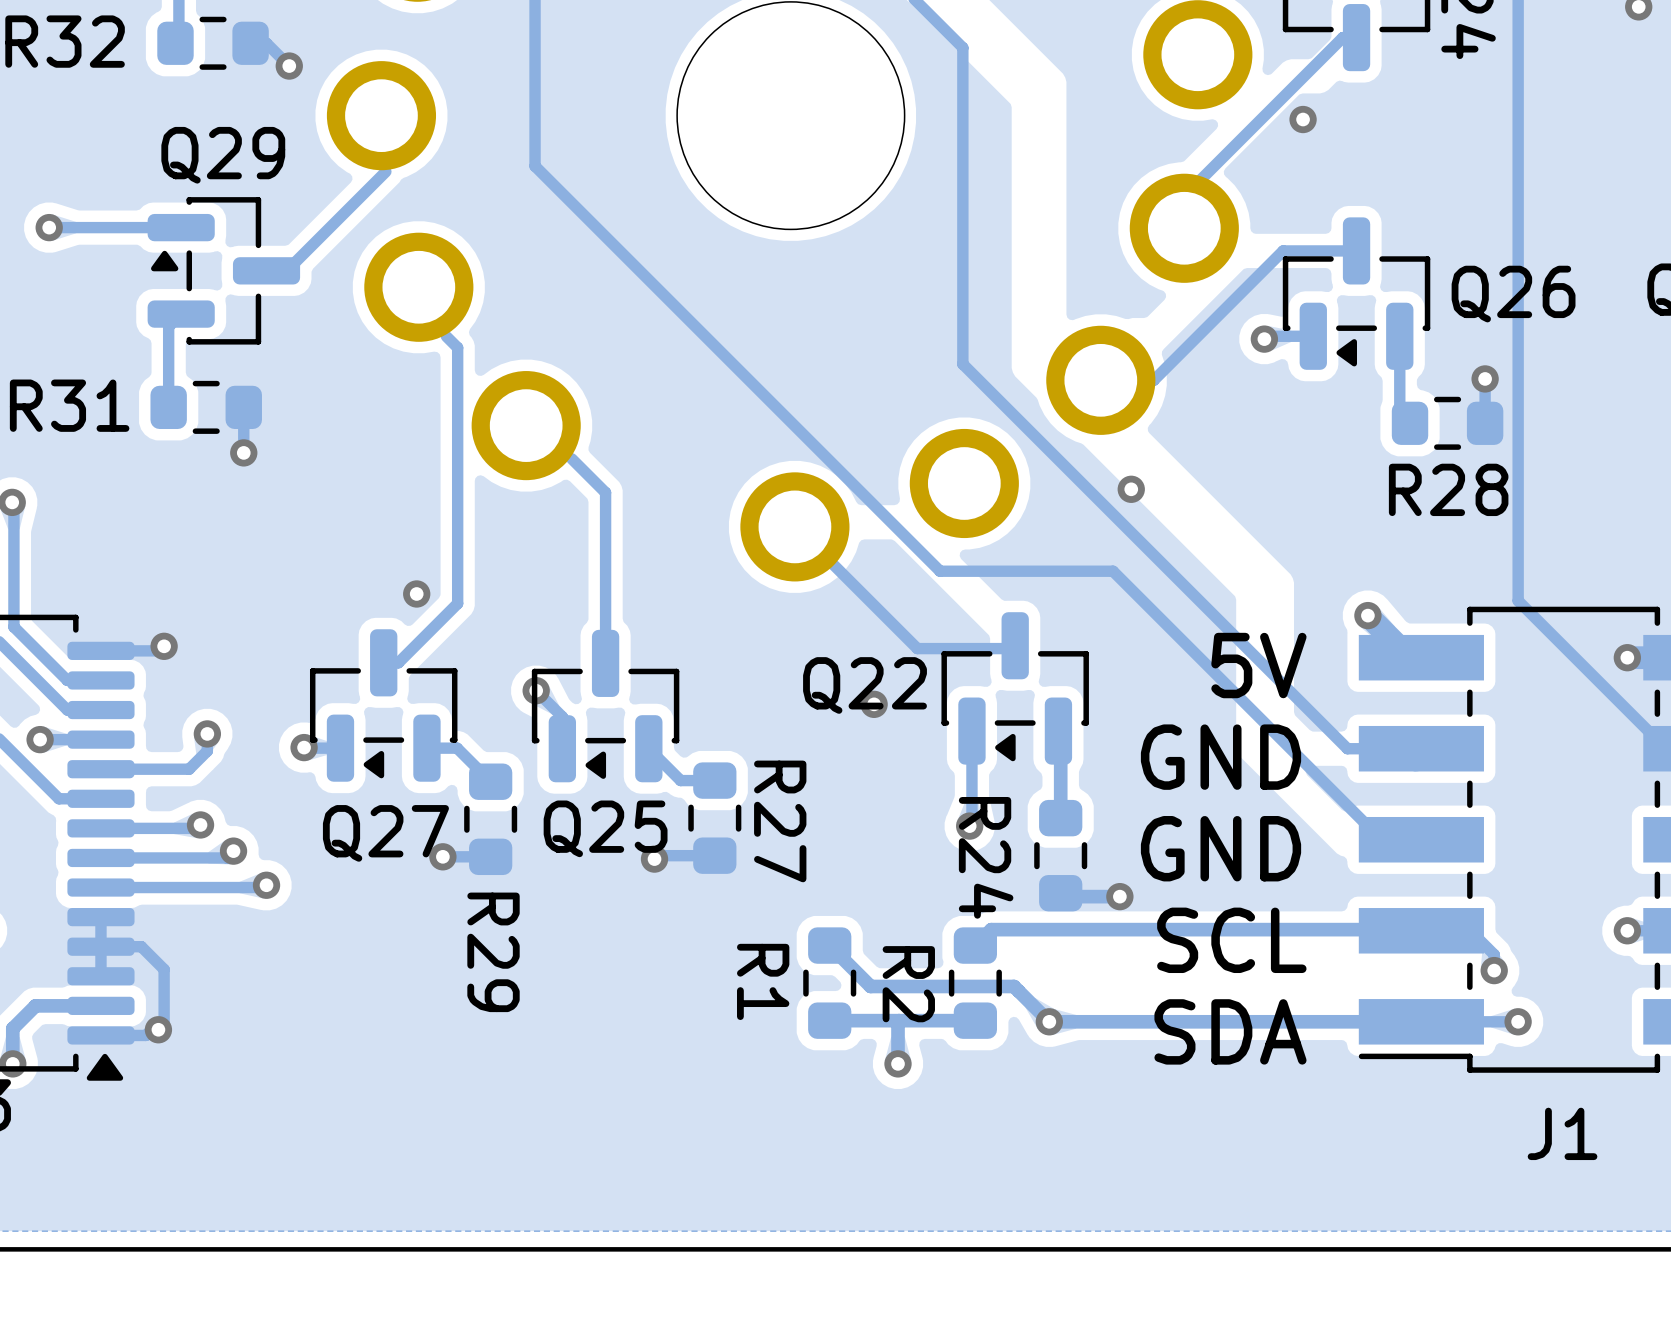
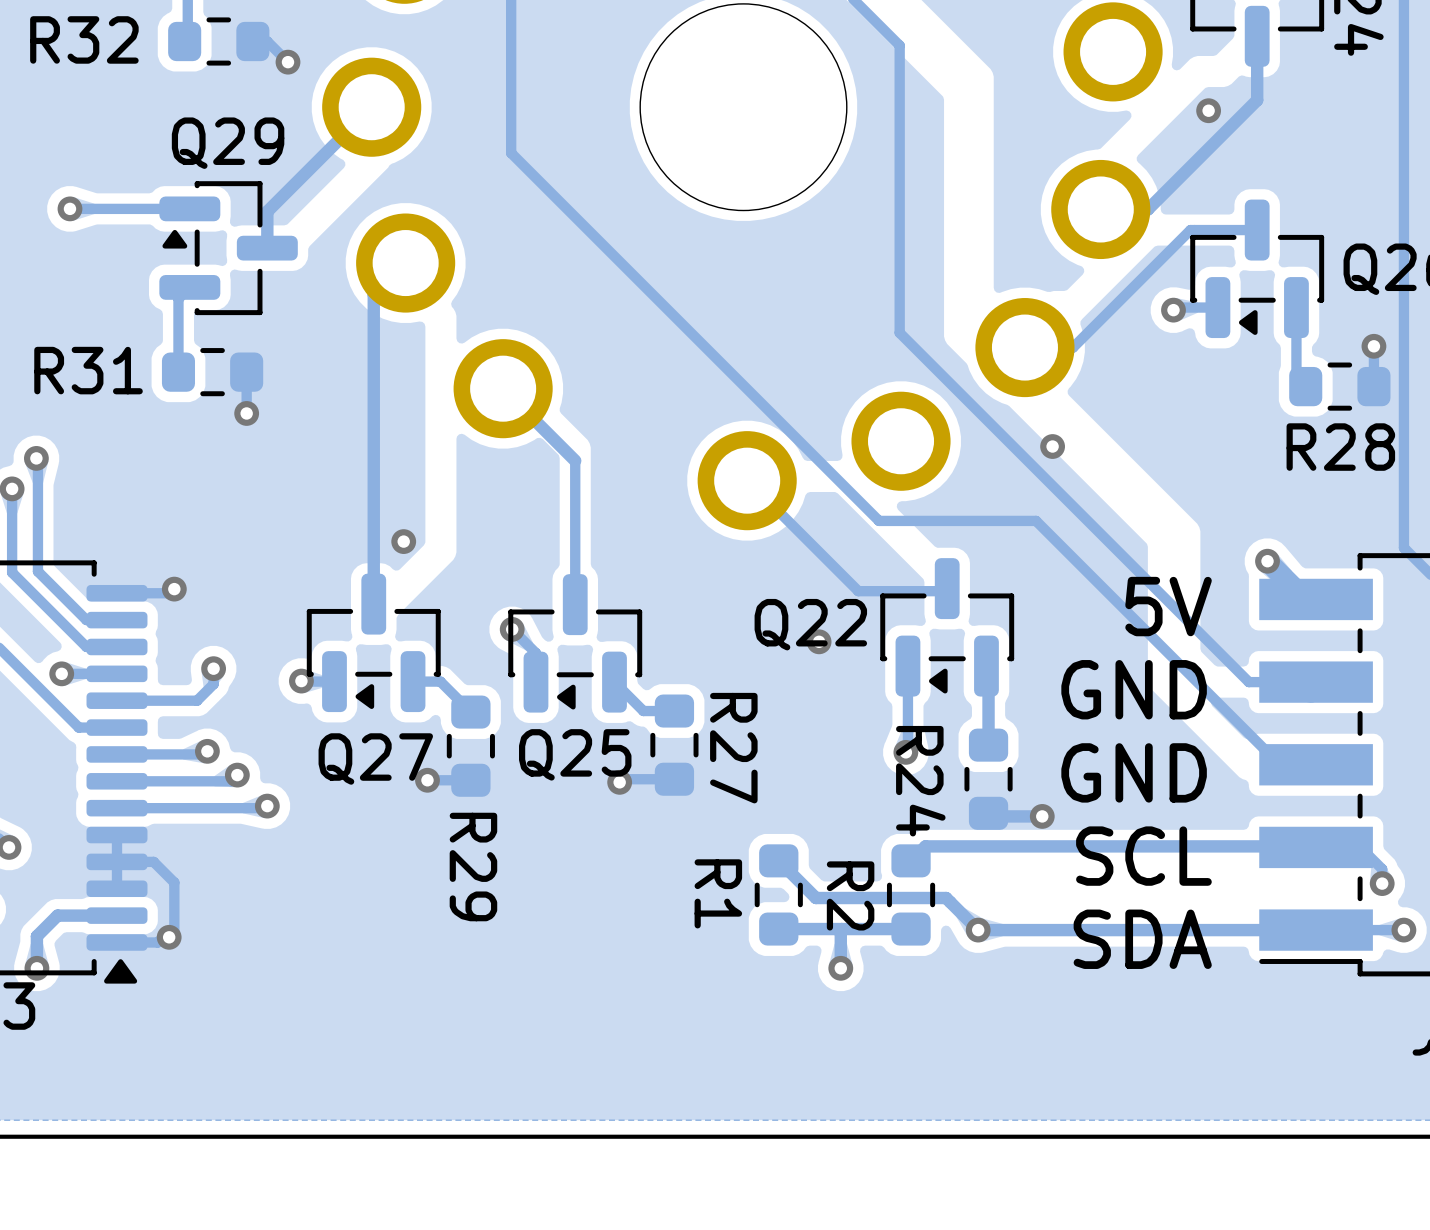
track: (1356, 37) (1342, 37) (1184, 196) -> (1257, 36) (1257, 100) (1147, 209) (1100, 209)
track: none -> (371, 107) (267, 211) (267, 248)
track: (385, 171) (293, 264) -> none
track: (446, 336) (457, 347) (457, 603) (398, 662) (383, 662) -> (405, 263) (373, 294) (373, 604)
track: (571, 458) (605, 492) (605, 505) -> (503, 388) (575, 460)

